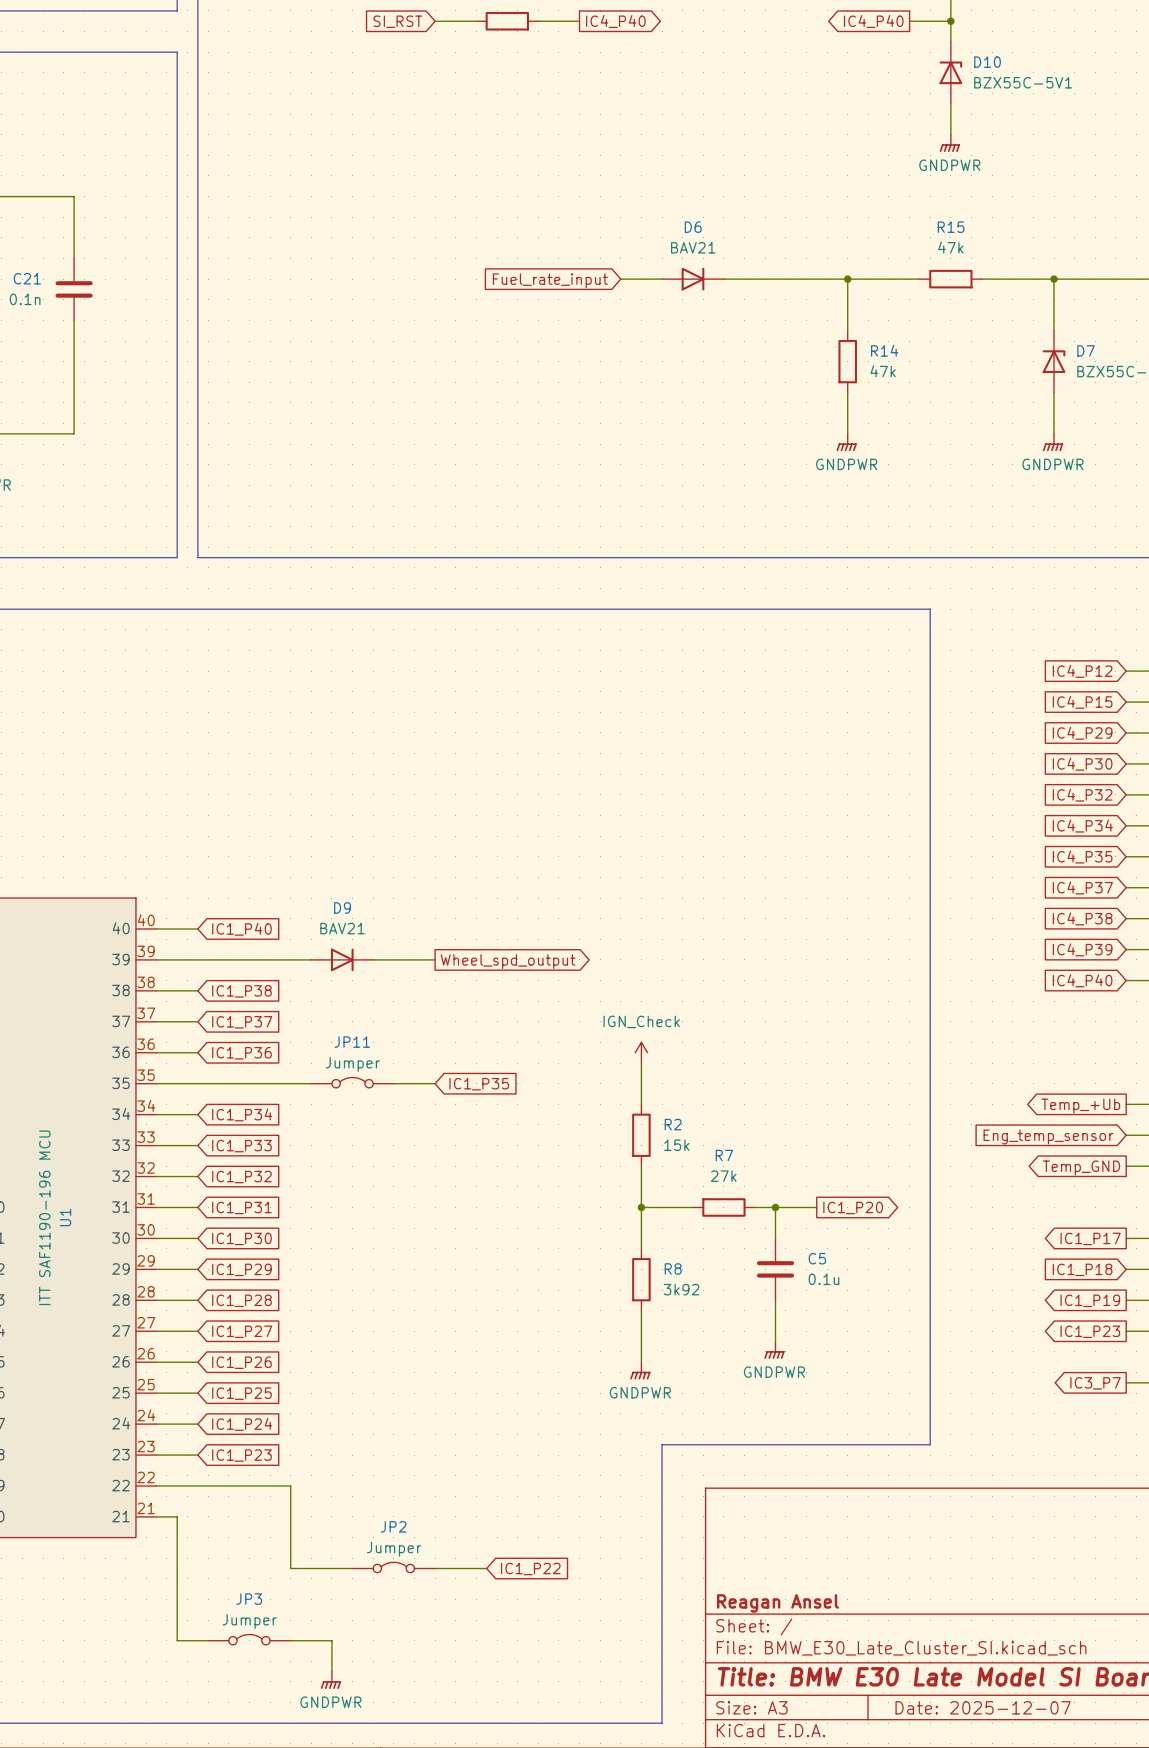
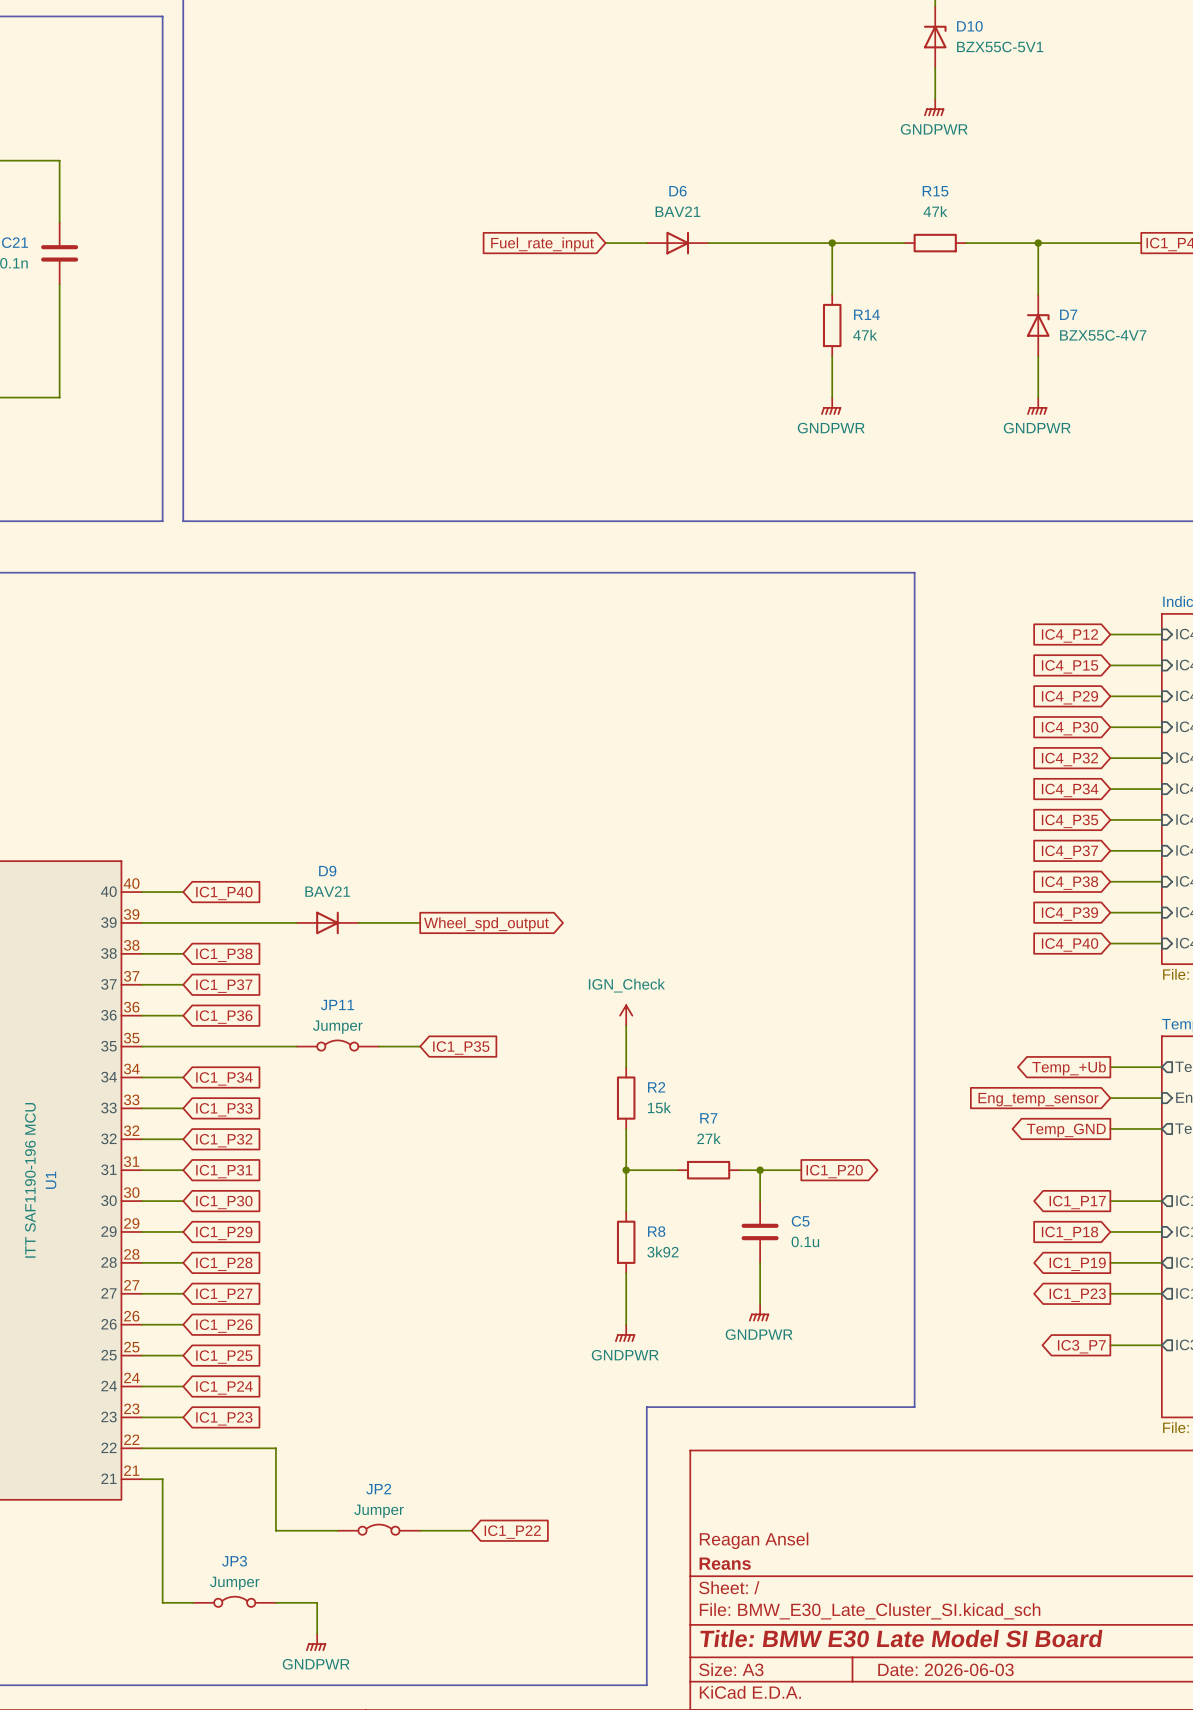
title block: none -> Reagan Ansel (754, 1540)
title block: Reagan Ansel (777, 1603) -> Reans (725, 1563)
title block: Date: 2025-12-07 (983, 1707) -> Date: 2026-06-03 (945, 1669)

